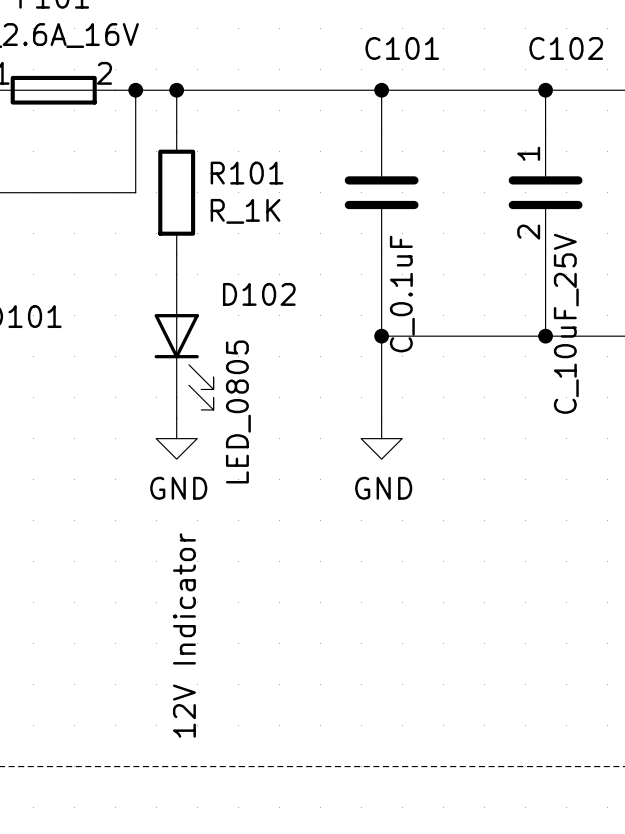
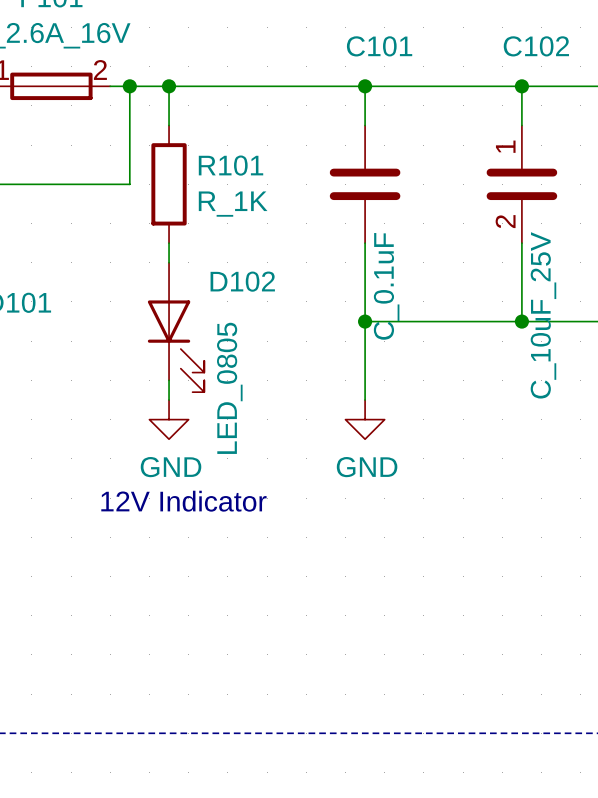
text rotation: 0° (184, 635) -> 90° clockwise (183, 501)

